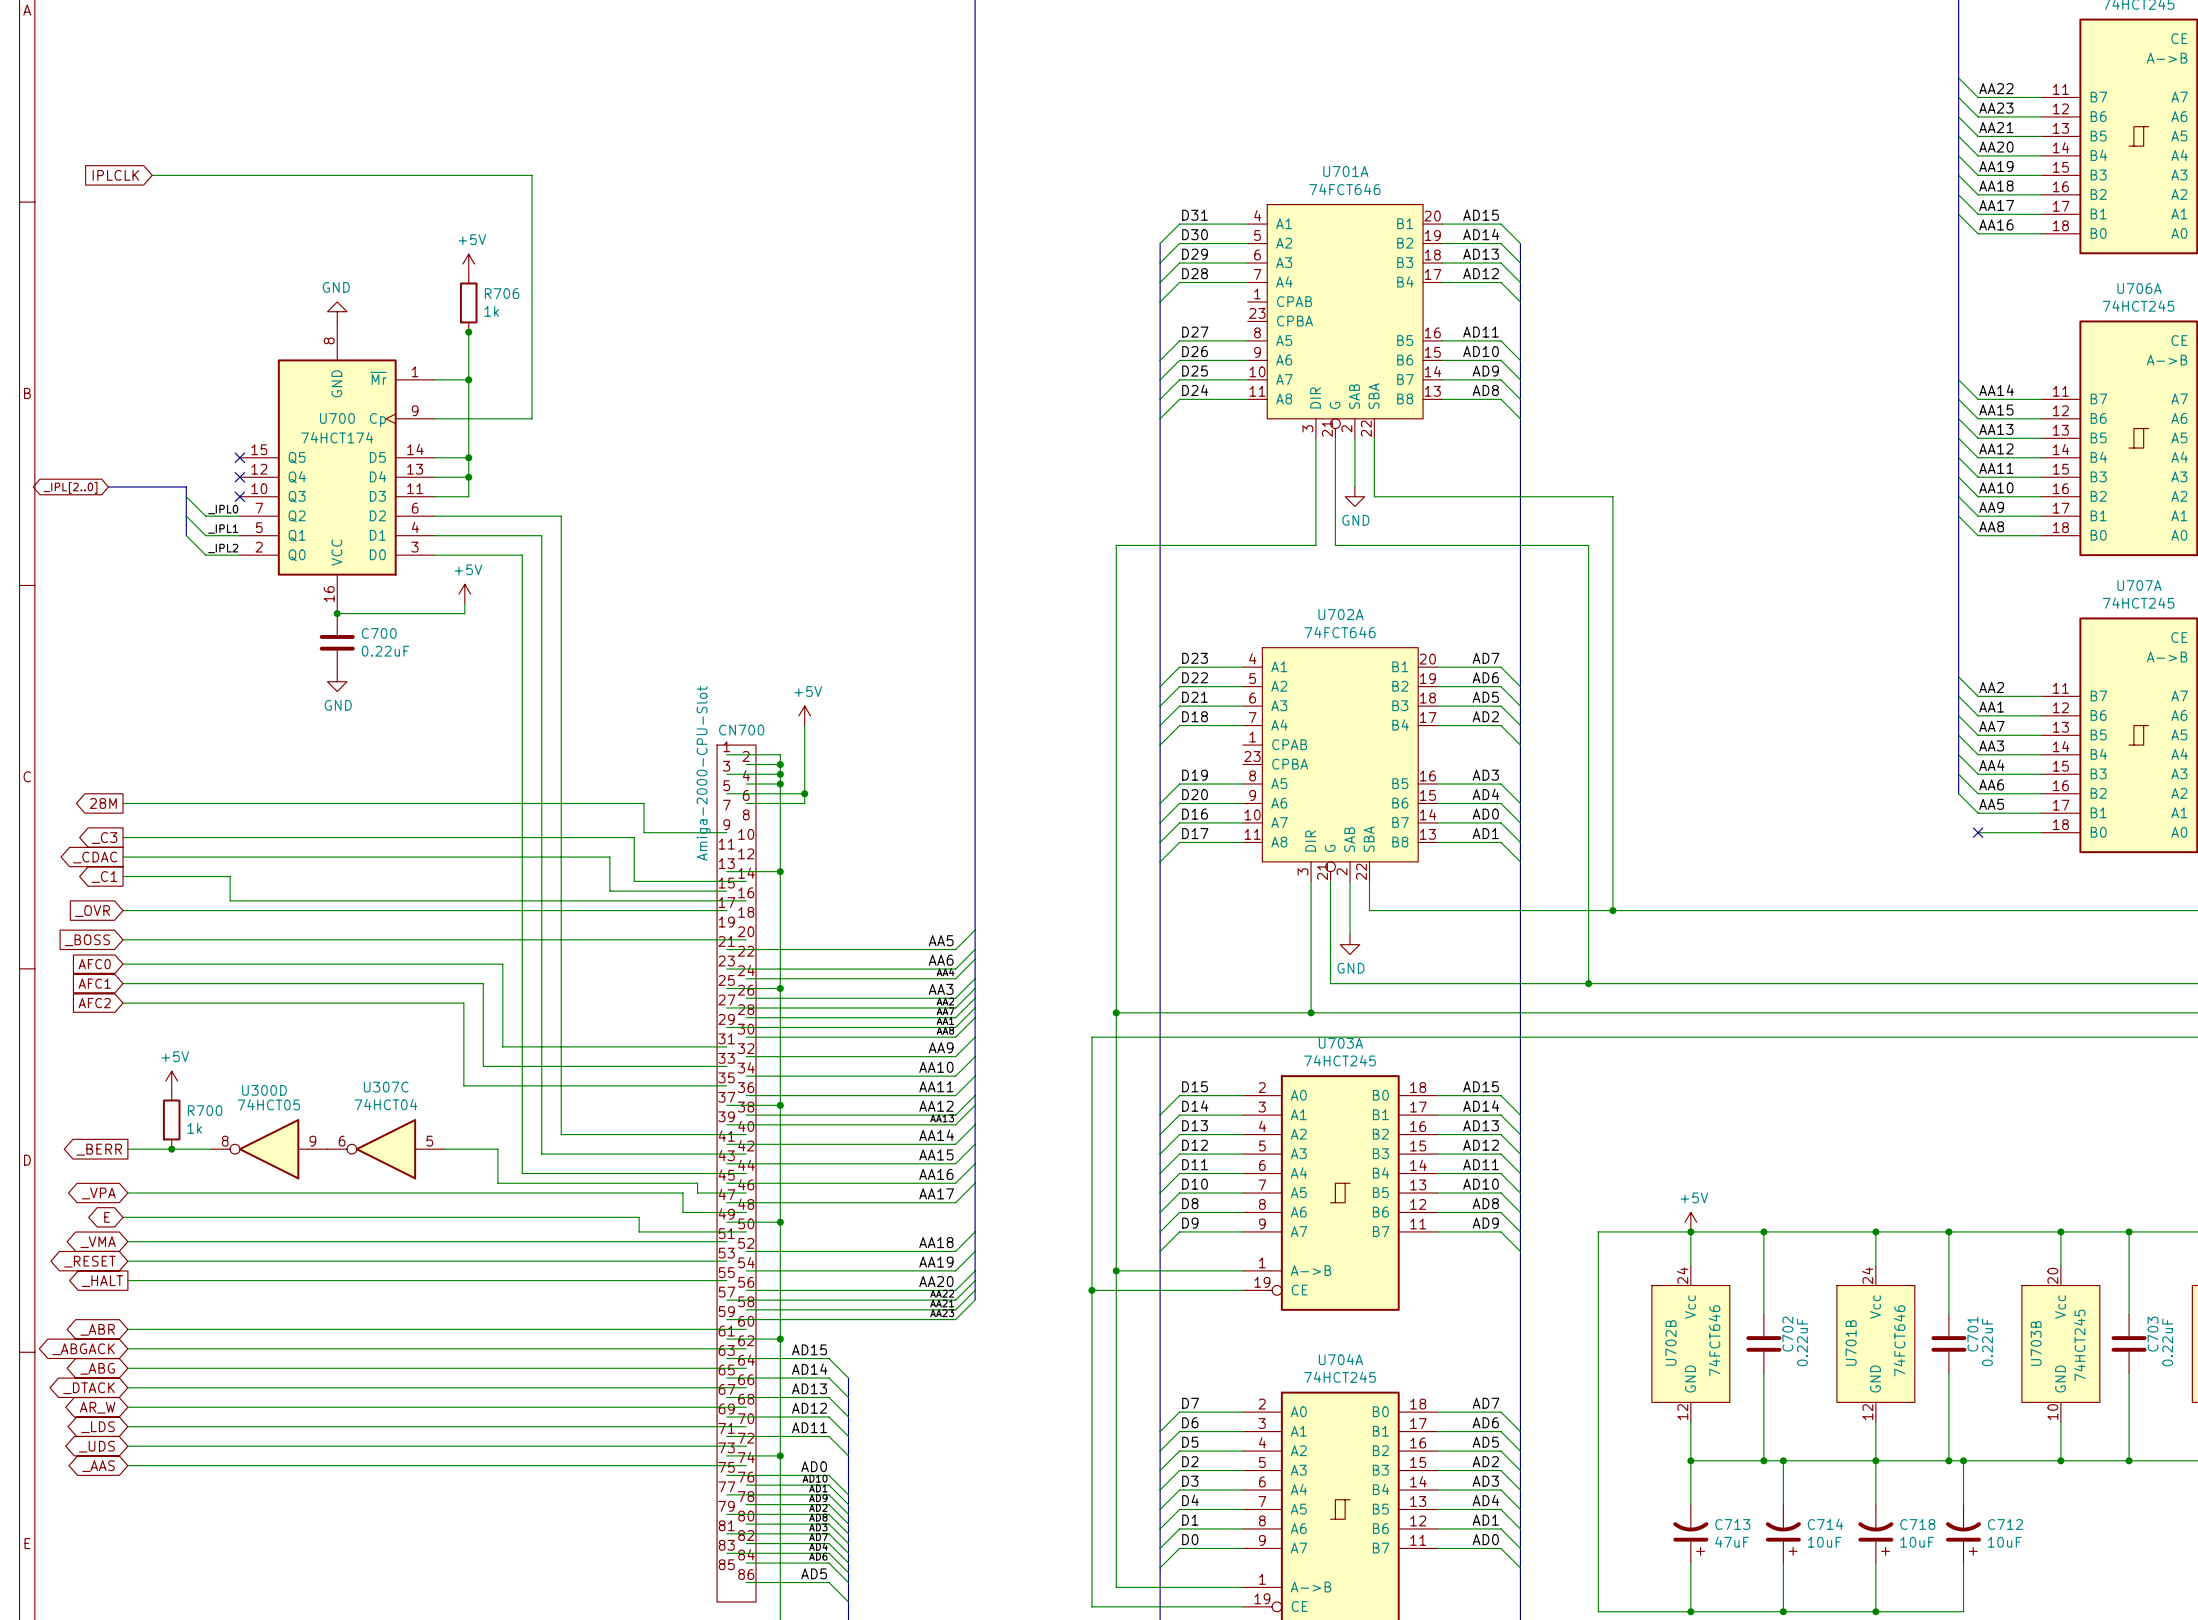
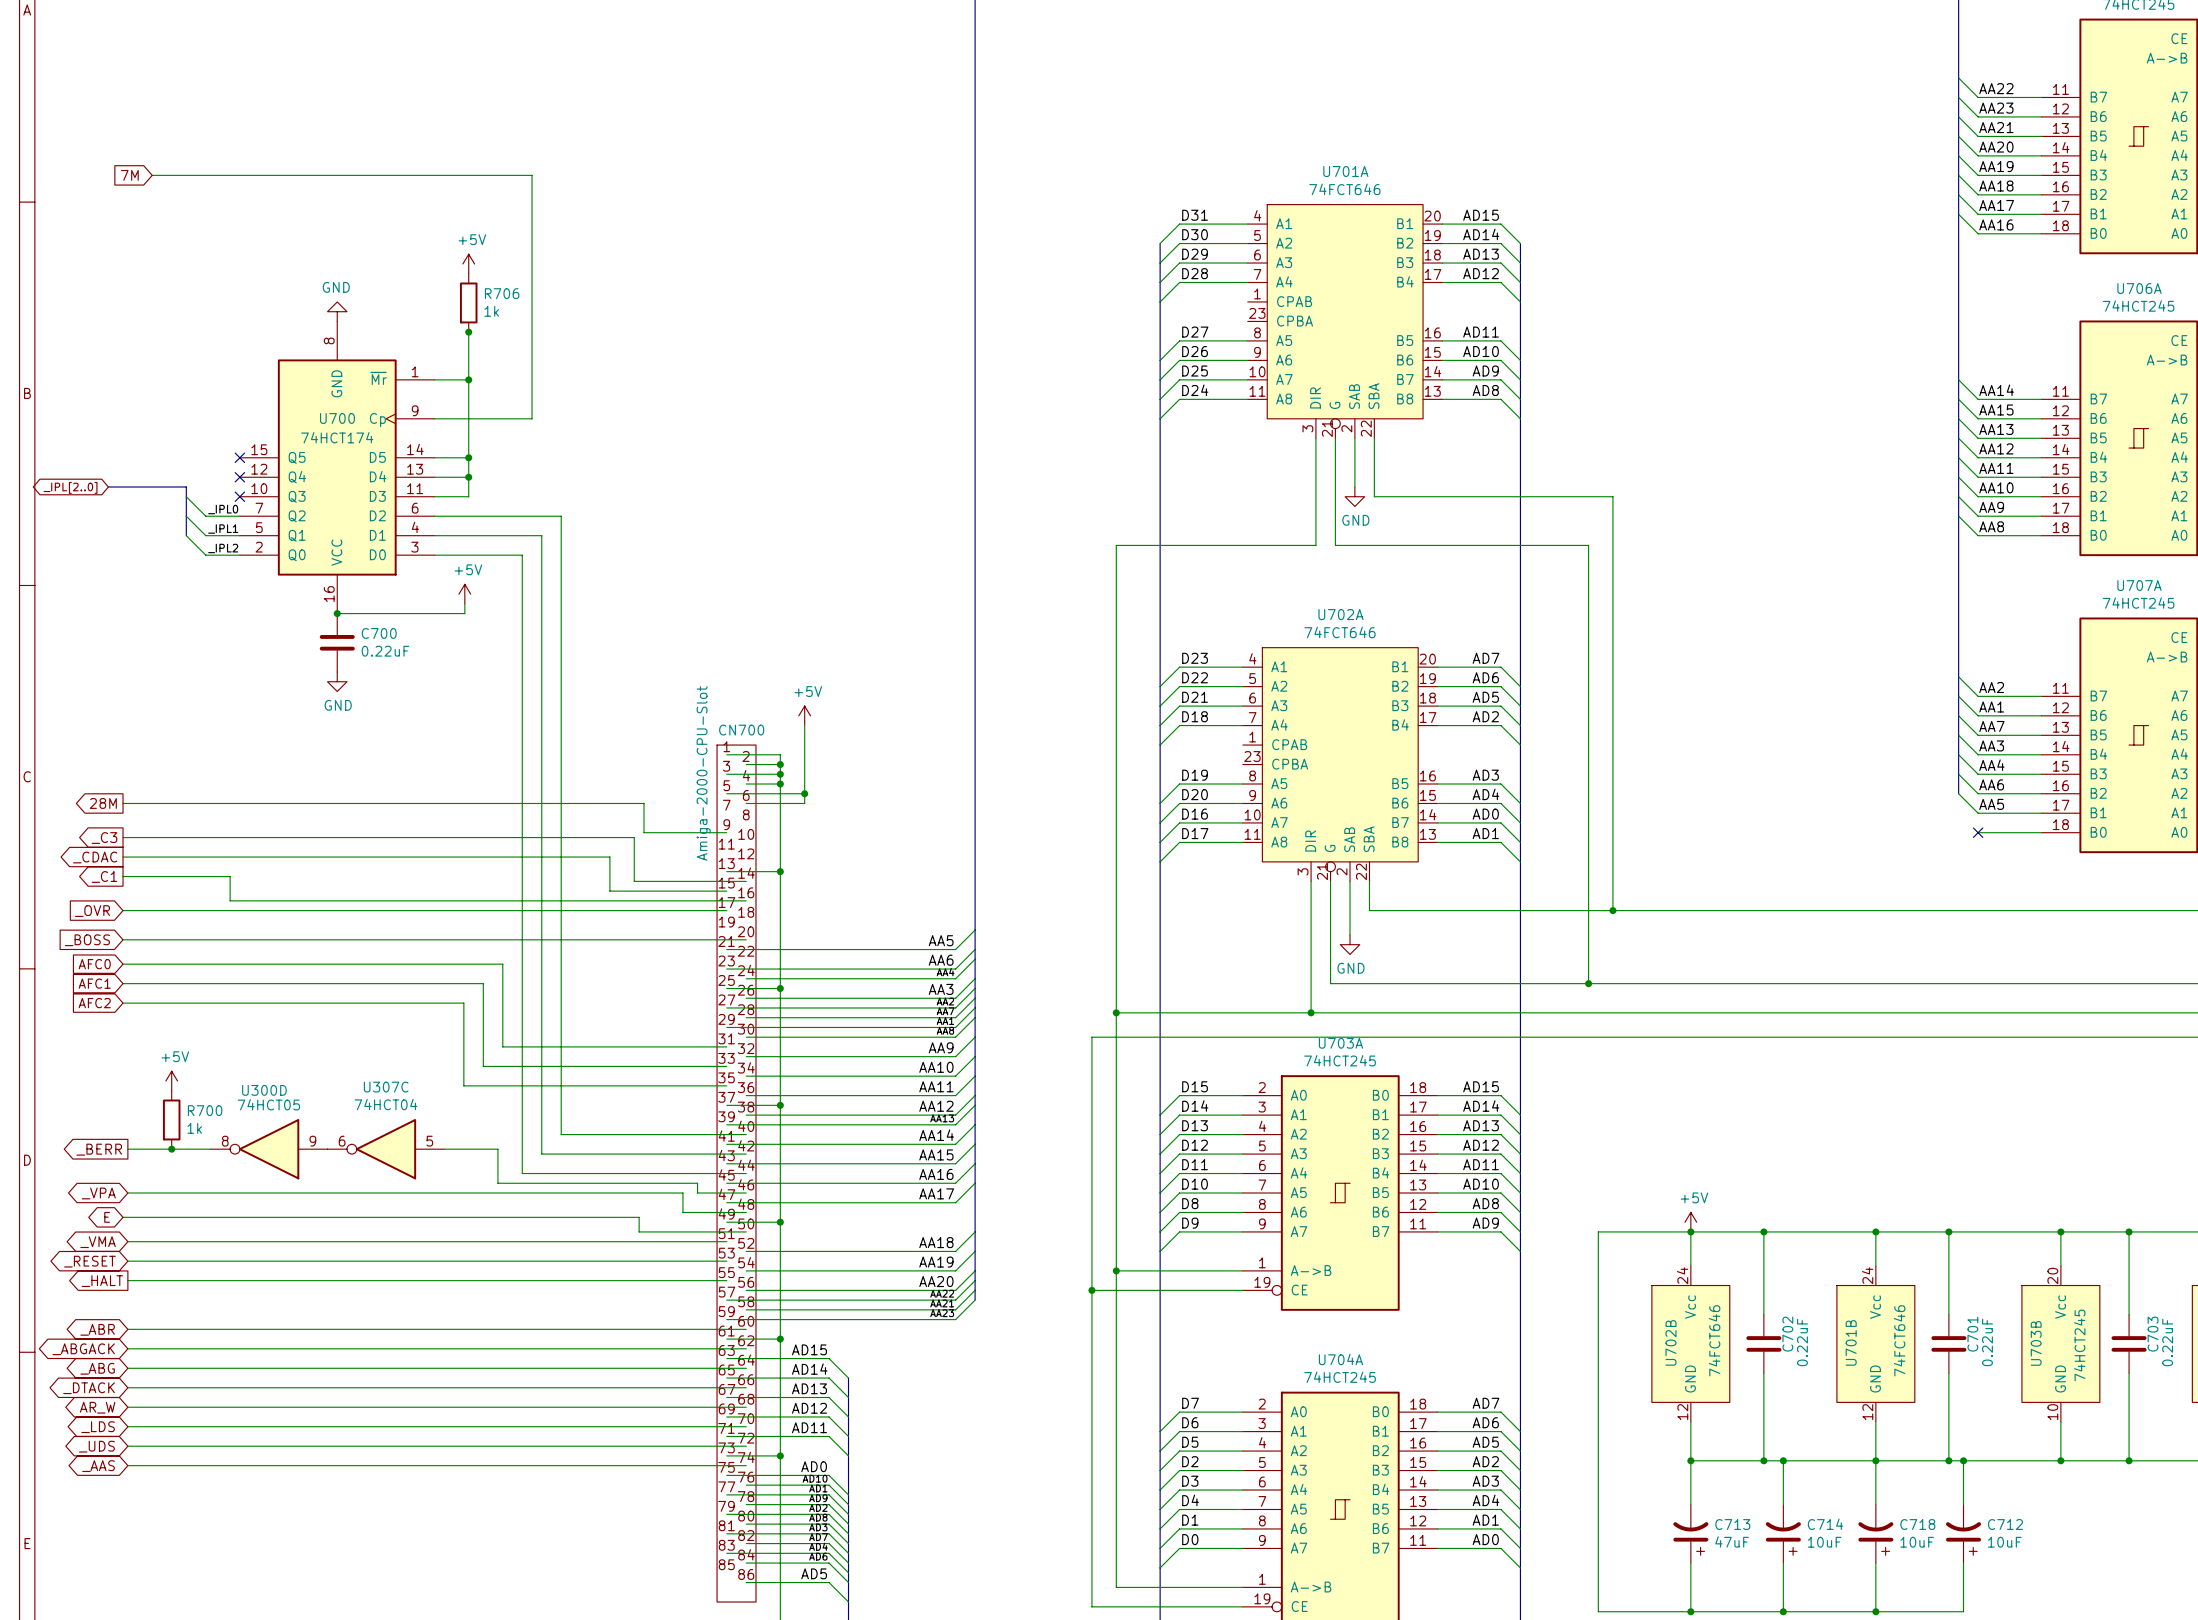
global label: IPLCLK (115, 175) -> 7M (129, 175)

